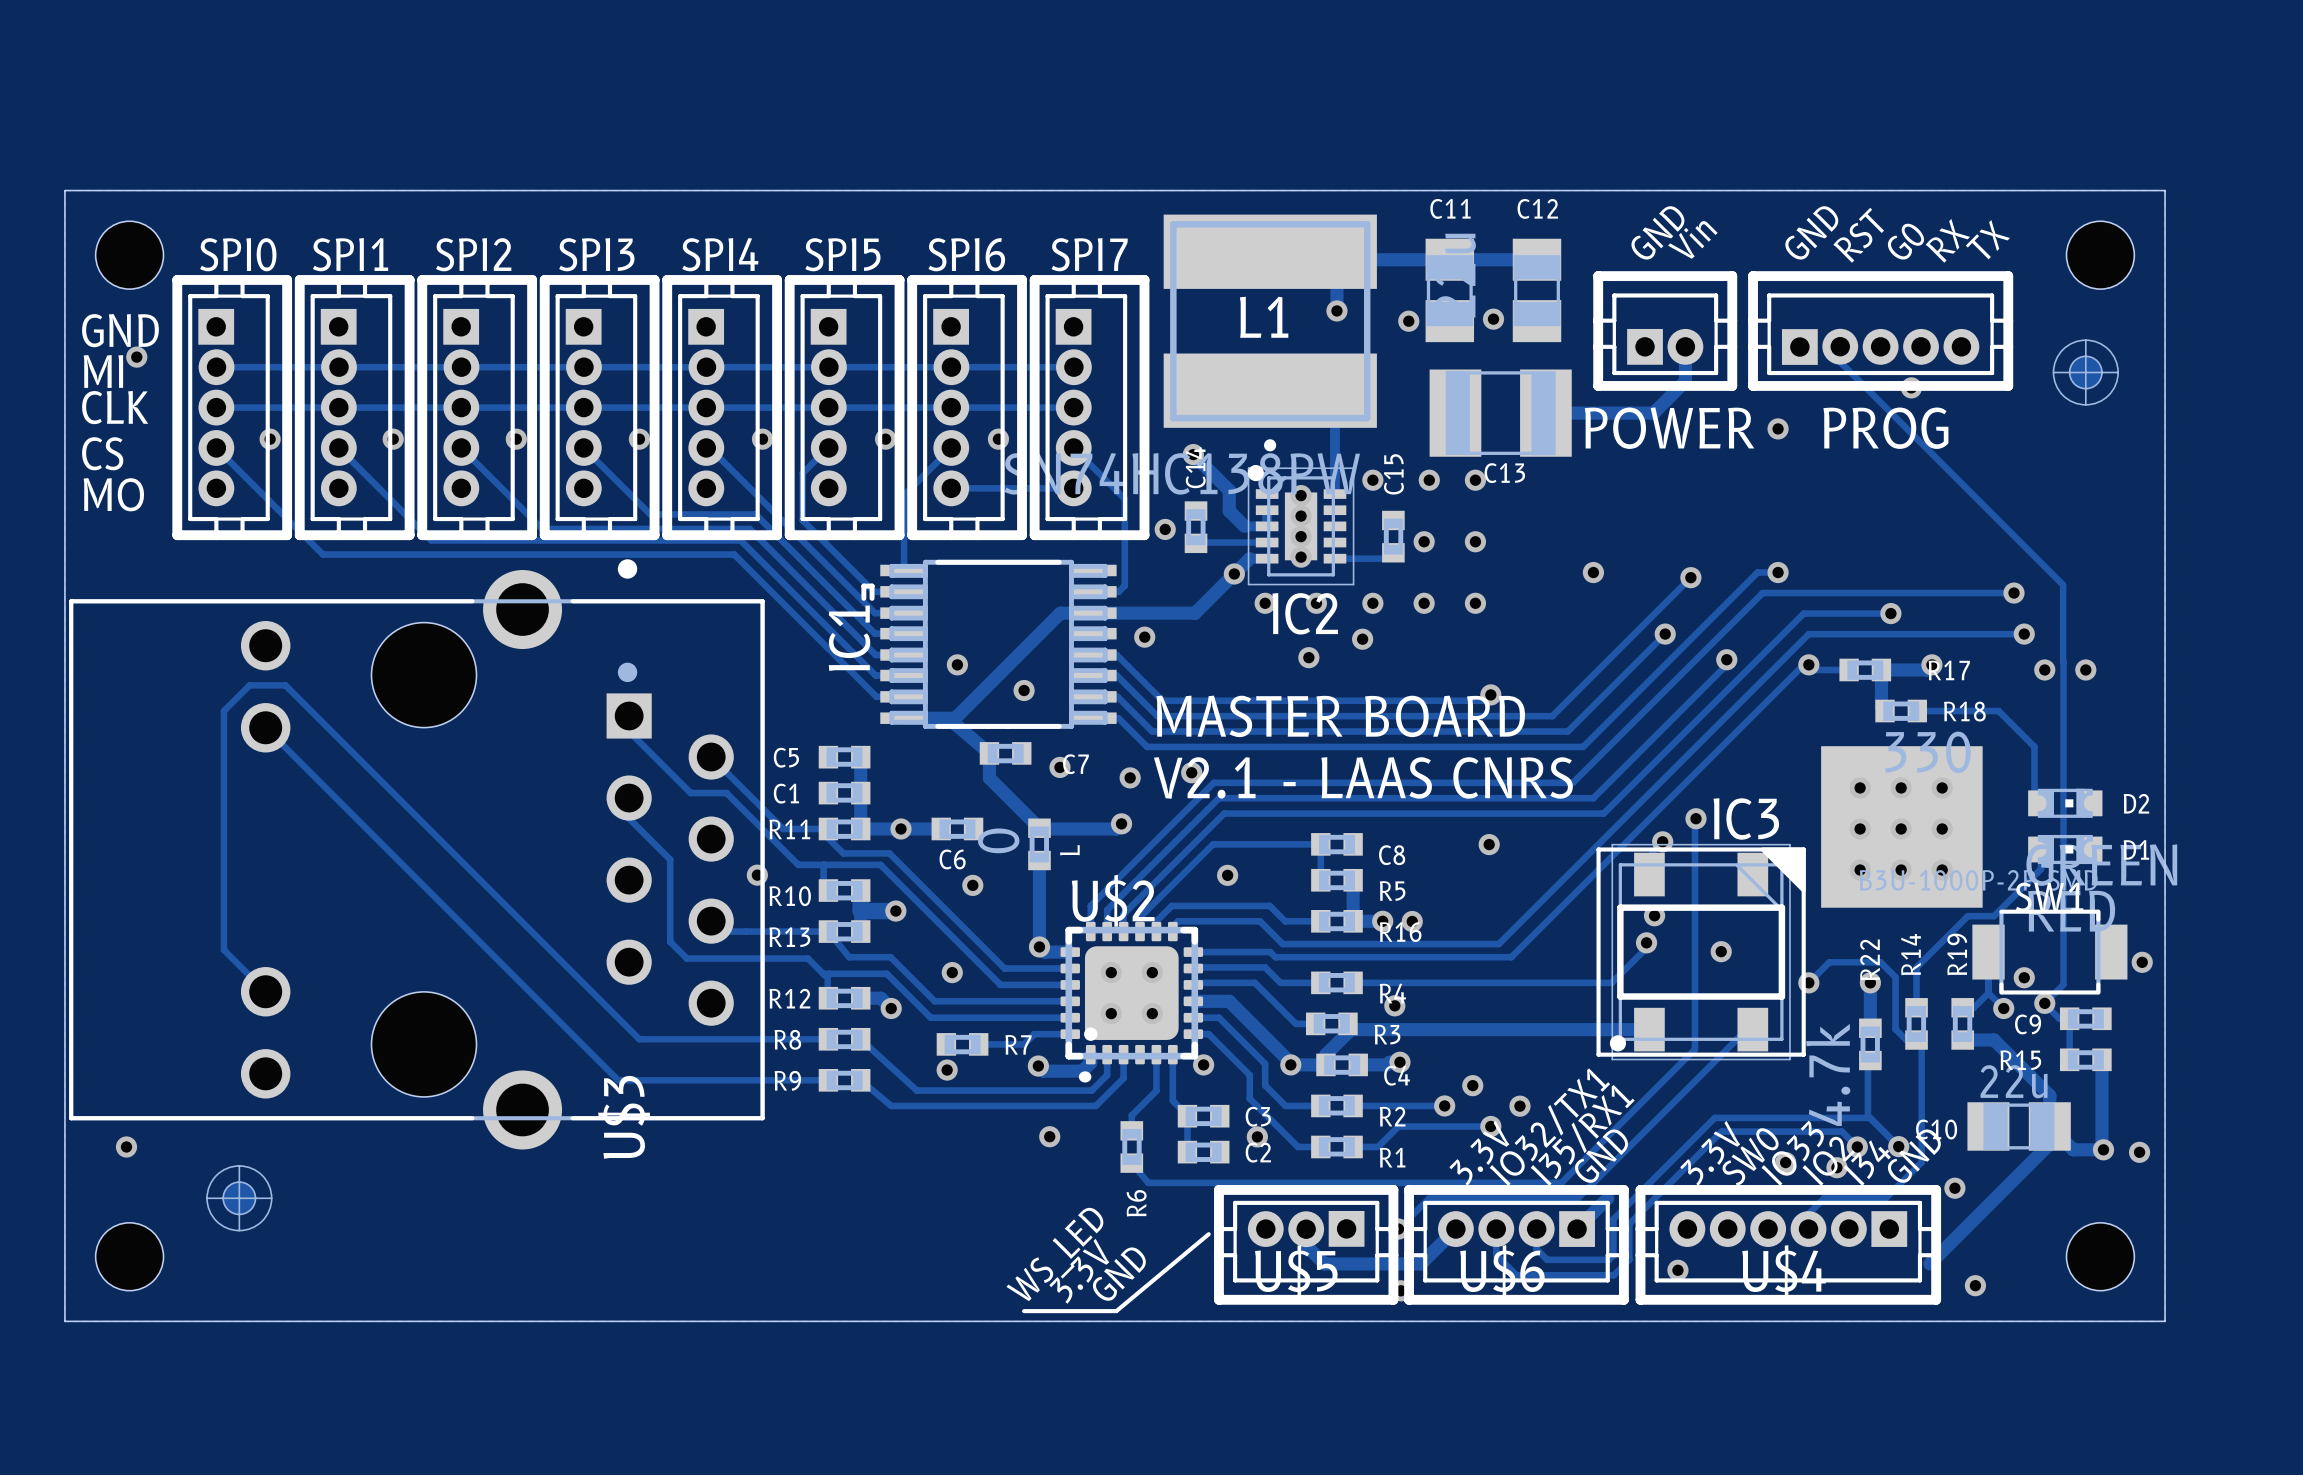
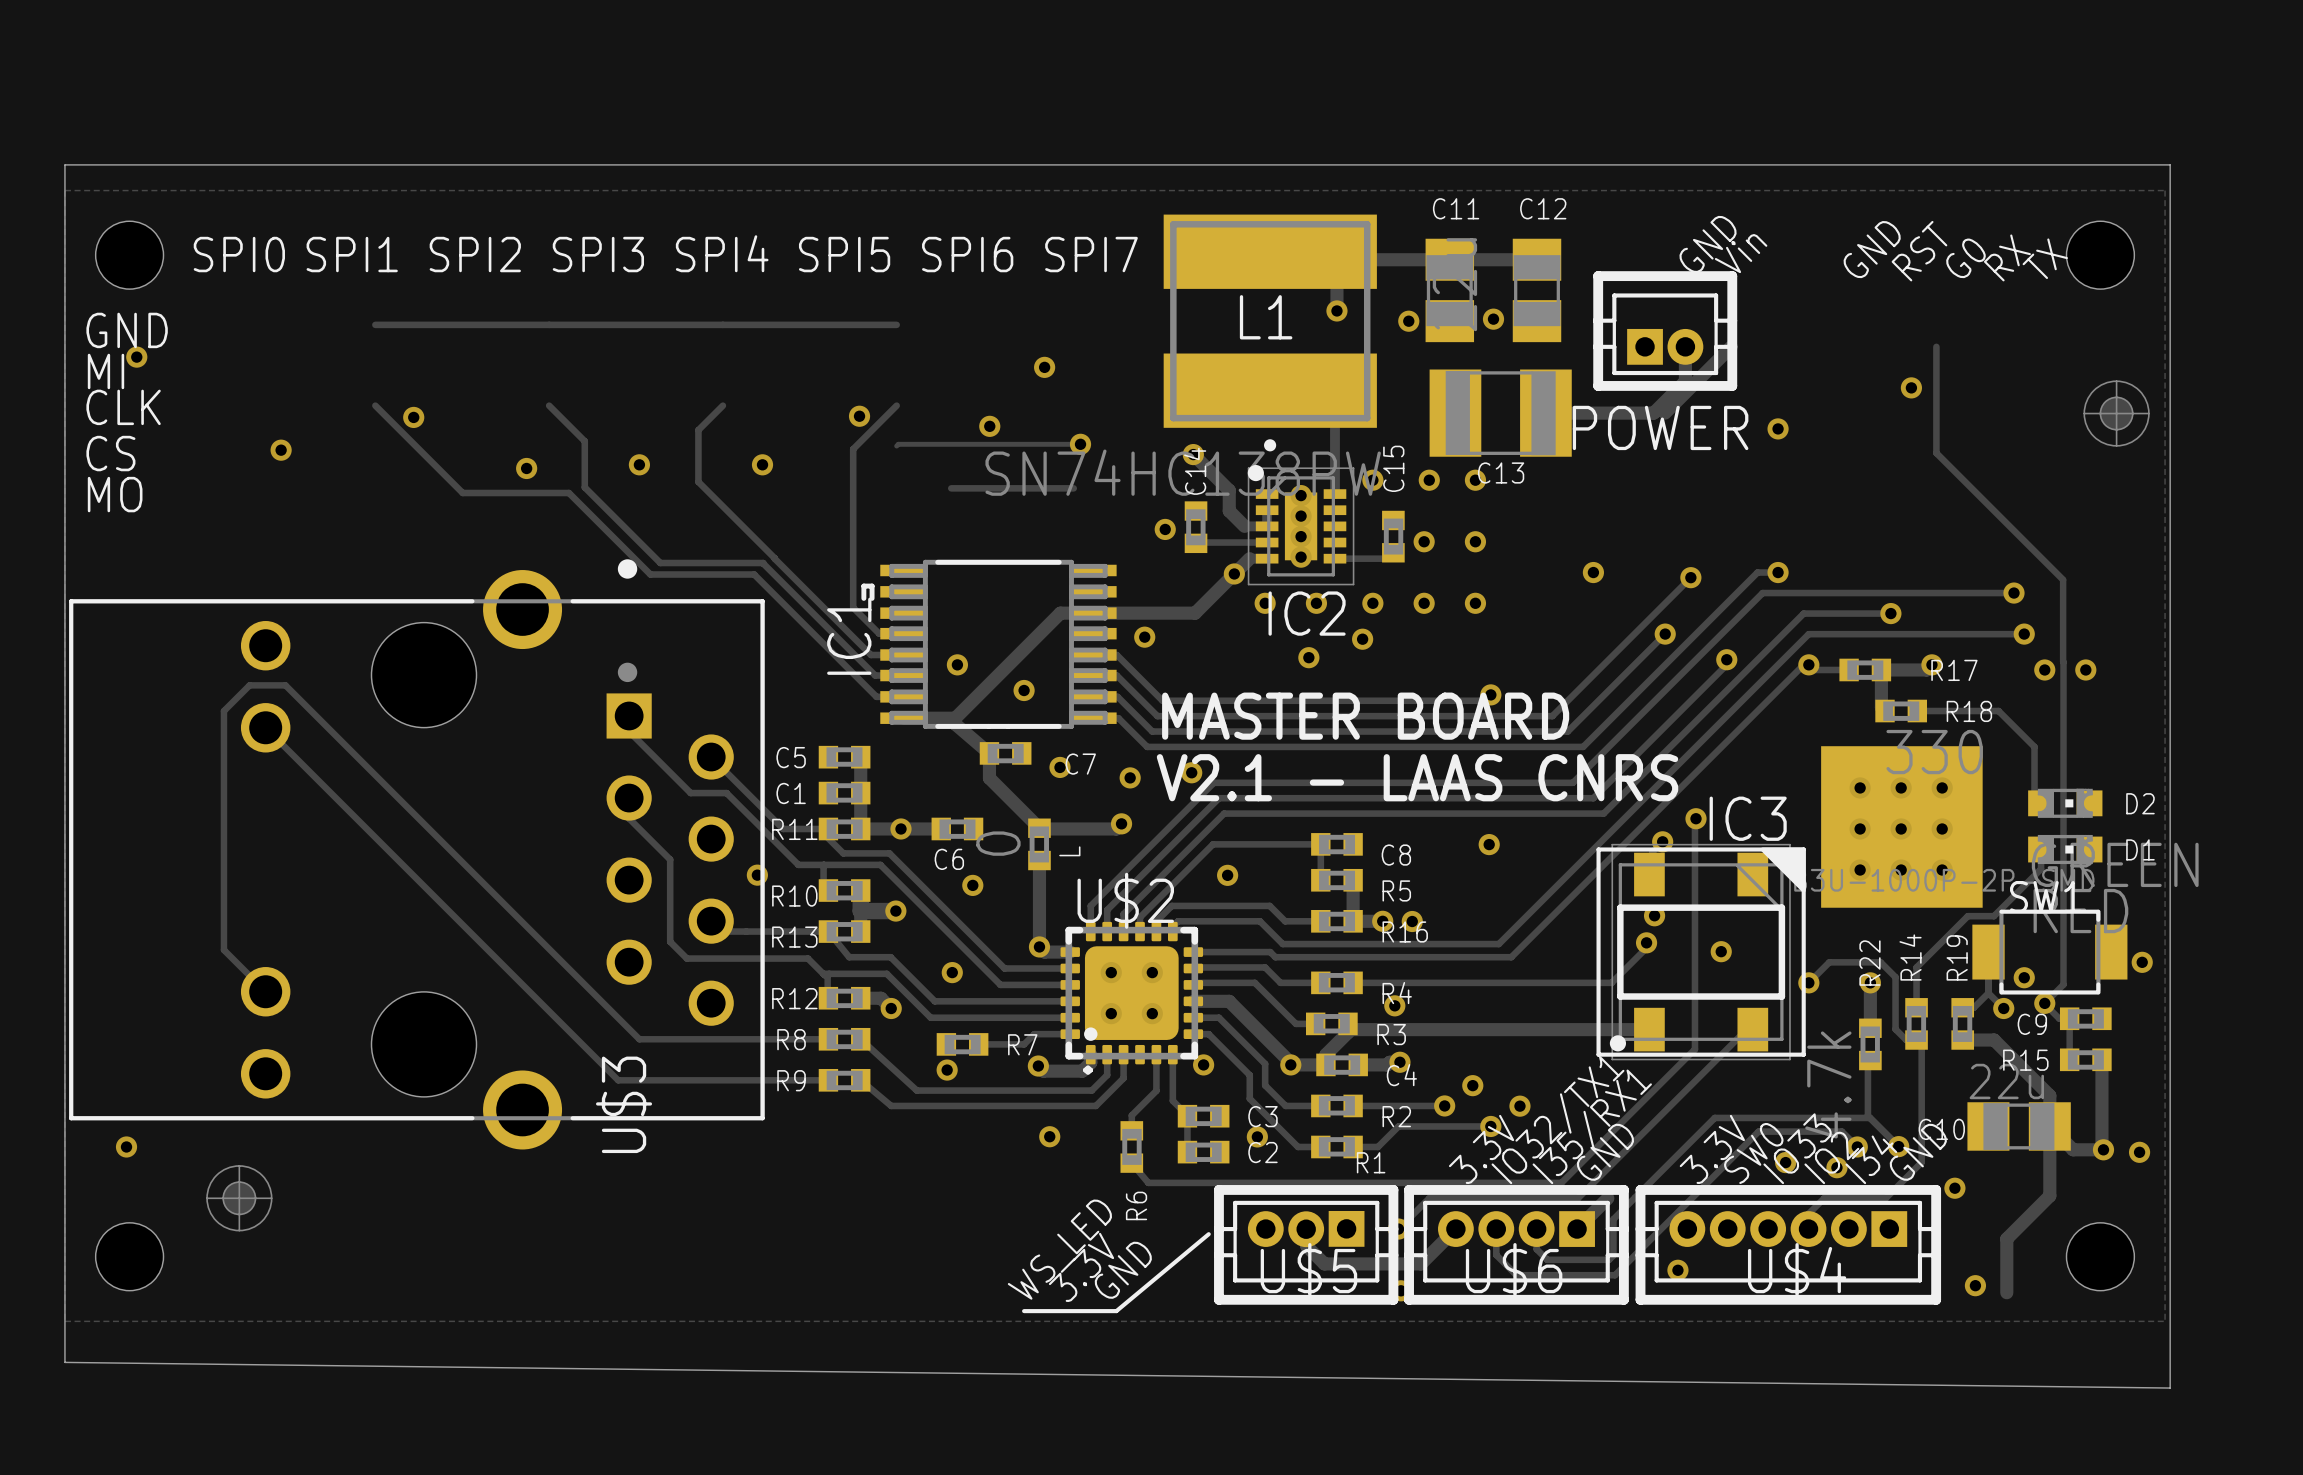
board edge: (64, 190) (2165, 190) (2165, 1321) (64, 1321) -> (64, 190) (64, 165) (2170, 164) (2170, 1388) (64, 1362) (64, 1321)
text position: GND (1657, 232) -> GND (1708, 244)
text position: GND (1811, 232) -> GND (1872, 249)
text position: RST (1858, 235) -> RST (1919, 251)
text position: Vin (1692, 239) -> Vin (1741, 253)
text position: TX (1987, 239) -> TX (2045, 258)
text position: RX (1947, 240) -> RX (2007, 257)
text position: G0 (1905, 241) -> G0 (1965, 258)
track: none -> (375, 324) (896, 324)
PROG: (1880, 331) -> none
track: none -> (1731, 346) (1665, 413)
track: (1840, 346) (1840, 362) (2063, 584) -> (1936, 346) (1936, 453) (2063, 579) (2063, 584)
track: (216, 367) (1073, 367) -> none
via: none -> (1044, 367)
drawing position: (2085, 372) -> (2116, 413)
track: none -> (549, 405) (584, 441) (584, 487) (660, 563) (763, 563)
track: none -> (722, 405) (698, 430) (698, 481) (774, 558)
track: (216, 407) (1073, 407) -> none
part: (232, 407) -> none
part: (354, 407) -> none
part: (477, 407) -> none
part: (599, 407) -> none
part: (722, 407) -> none
part: (844, 407) -> none
part: (967, 407) -> none
part: (1089, 407) -> none
via position: (270, 439) -> (281, 450)
via position: (393, 439) -> (413, 417)
via position: (516, 439) -> (526, 468)
via position: (639, 439) -> (639, 464)
via position: (762, 439) -> (762, 464)
via position: (885, 439) -> (859, 416)
via position: (998, 439) -> (989, 426)
track: none -> (1080, 444) (898, 444) (896, 446)
via: none -> (1080, 444)
track: (216, 447) (322, 554) (734, 554) (754, 574) -> (375, 405) (462, 493) (568, 493) (650, 574) (754, 574)
track: (338, 447) (431, 540) (740, 540) (875, 675) -> (763, 563) (875, 675)
track: (461, 447) (542, 528) (749, 528) (875, 655) -> (774, 558) (871, 655) (875, 655)
track: (583, 447) (650, 514) (755, 514) (874, 633) (879, 633) -> (896, 405) (853, 449) (853, 607) (879, 633)
track: (706, 447) (709, 447) (874, 613) (904, 613) -> none
track: (828, 447) (802, 473) (802, 520) (874, 591) (904, 591) -> none
track: (951, 447) (904, 495) (904, 570) -> none
track: (1073, 447) (1124, 499) (1124, 585) (1118, 591) (1092, 591) -> none
track: (1758, 1131) (1721, 1131) (1629, 1223) (1629, 1259) (1613, 1275) -> (1758, 1131) (1613, 1275)
track: (2049, 1143) (1929, 1263) -> (2049, 1143) (2049, 1195) (2006, 1238) (2006, 1292)
R1 name position: R1 (1392, 1157) -> R1 (1371, 1162)

